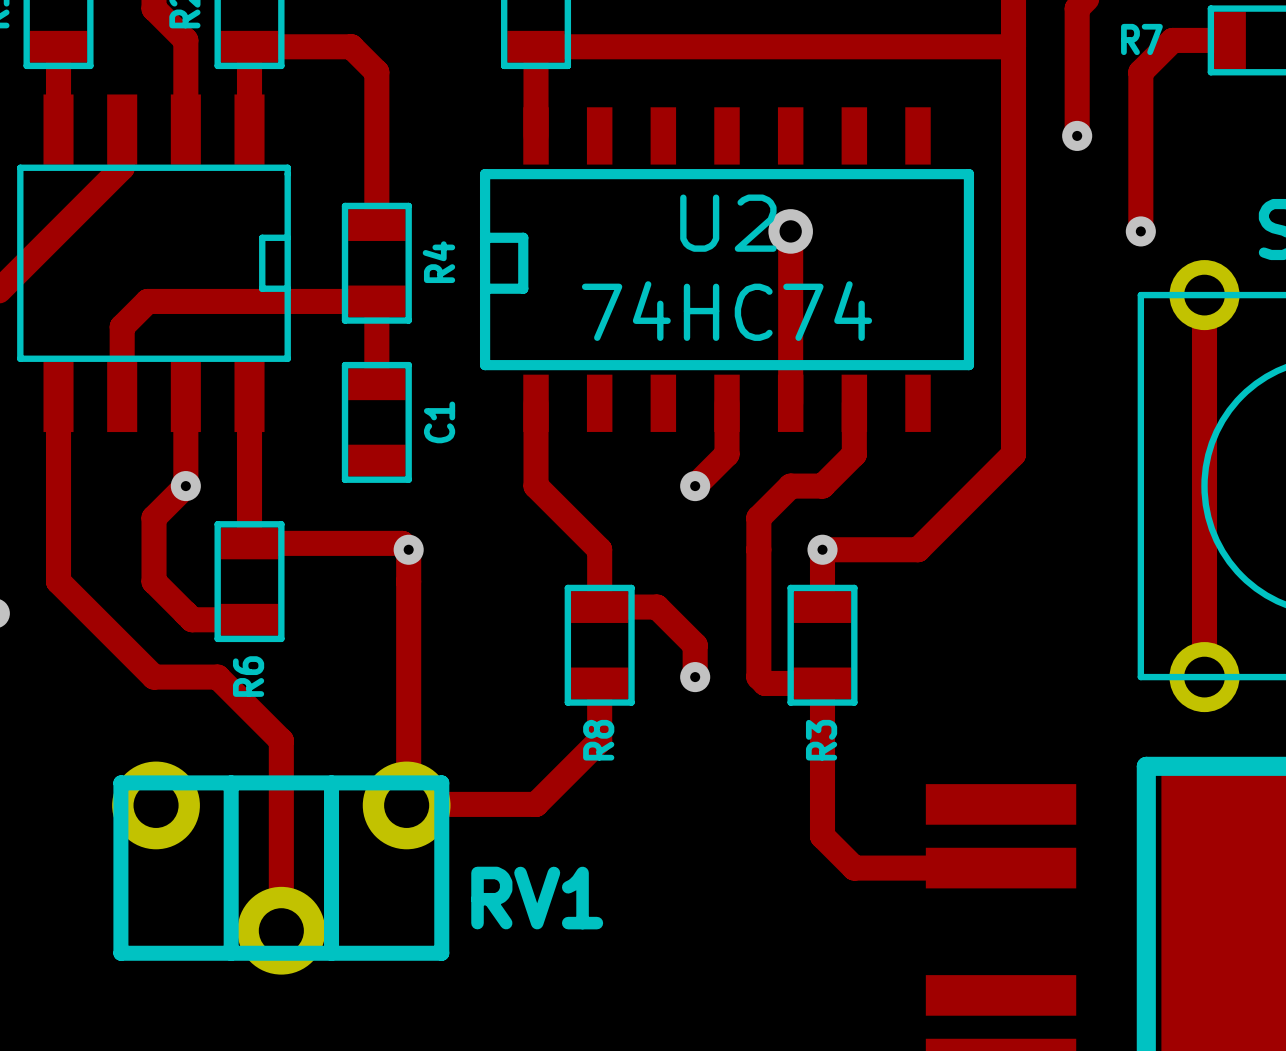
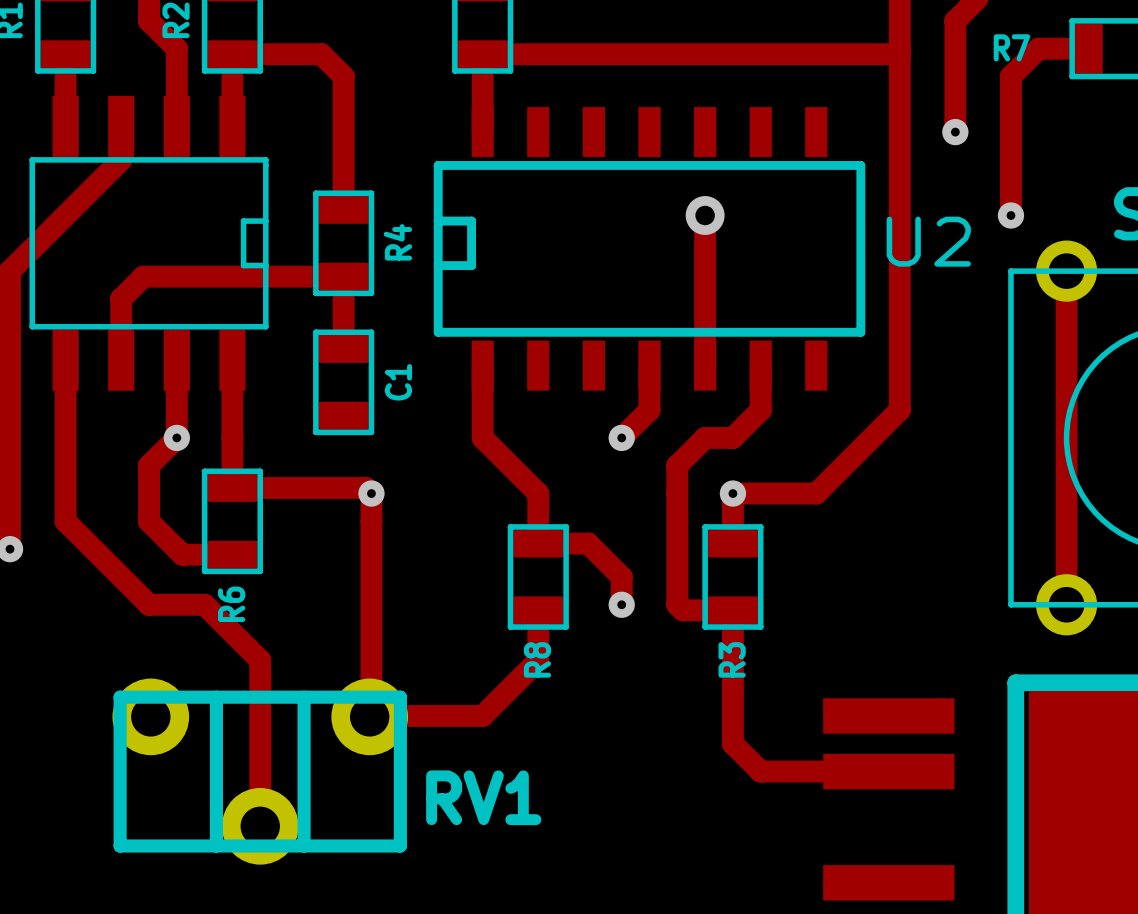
U2 name position: U2 (728, 223) -> U2 (928, 241)
U2 value: 74HC74 (727, 311) -> none

